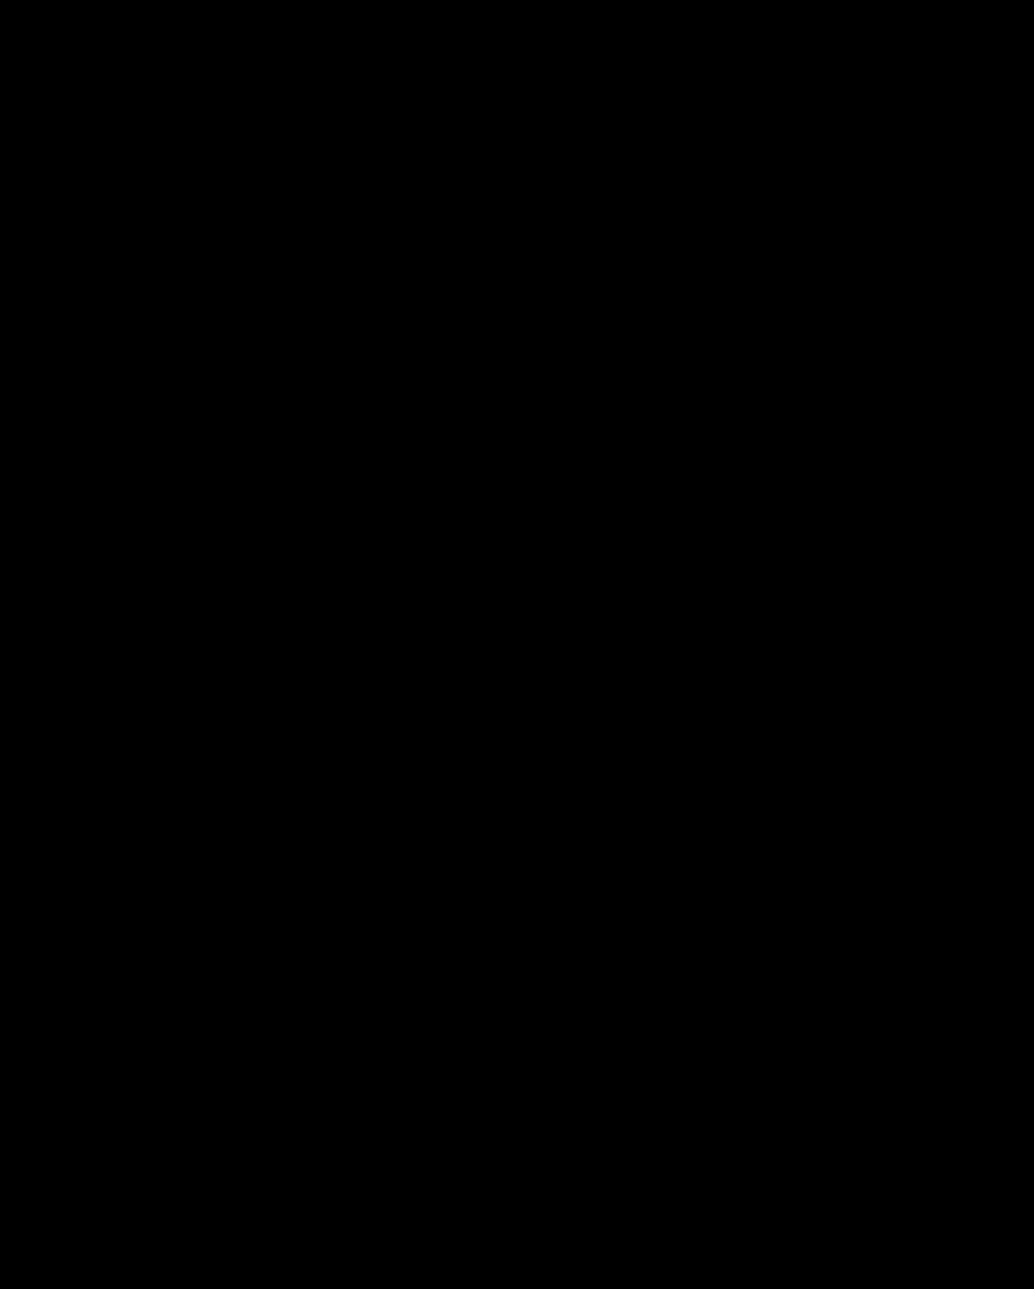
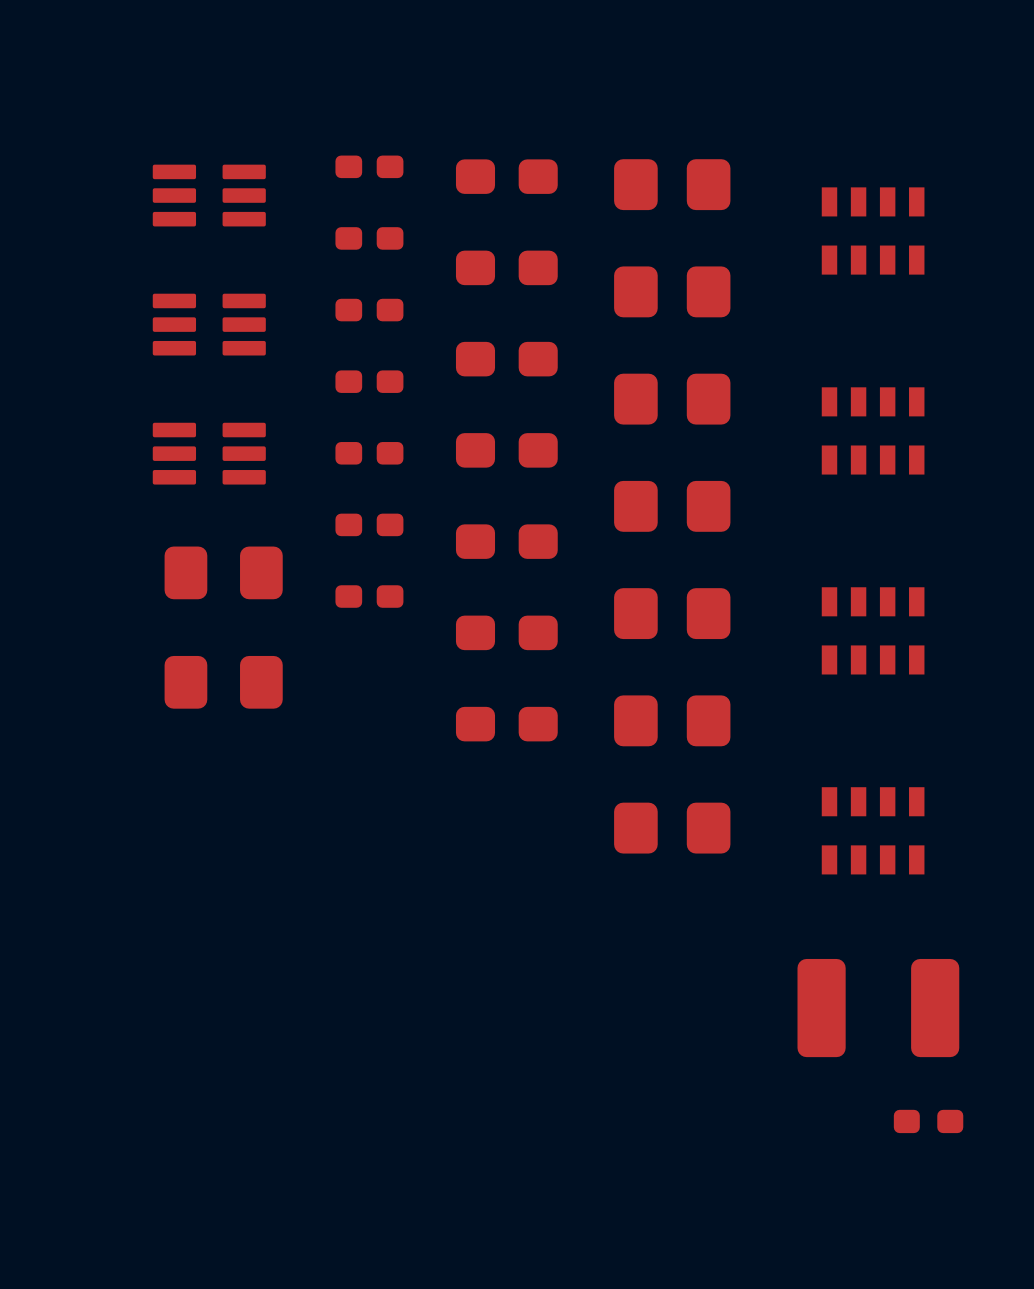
part: none -> (369, 166)
part: none -> (506, 176)
part: none -> (672, 184)
part: none -> (209, 195)
part: none -> (873, 230)
part: none -> (369, 238)
part: none -> (506, 267)
part: none -> (672, 291)
part: none -> (369, 310)
part: none -> (209, 324)
part: none -> (506, 359)
part: none -> (369, 381)
part: none -> (672, 399)
part: none -> (873, 430)
part: none -> (506, 450)
part: none -> (209, 453)
part: none -> (369, 453)
part: none -> (672, 506)
part: none -> (369, 524)
part: none -> (506, 541)
part: none -> (223, 572)
part: none -> (369, 596)
part: none -> (672, 613)
part: none -> (873, 630)
part: none -> (506, 632)
part: none -> (223, 682)
part: none -> (672, 720)
part: none -> (506, 724)
part: none -> (672, 828)
part: none -> (873, 830)
part: none -> (878, 1008)
part: none -> (928, 1121)

